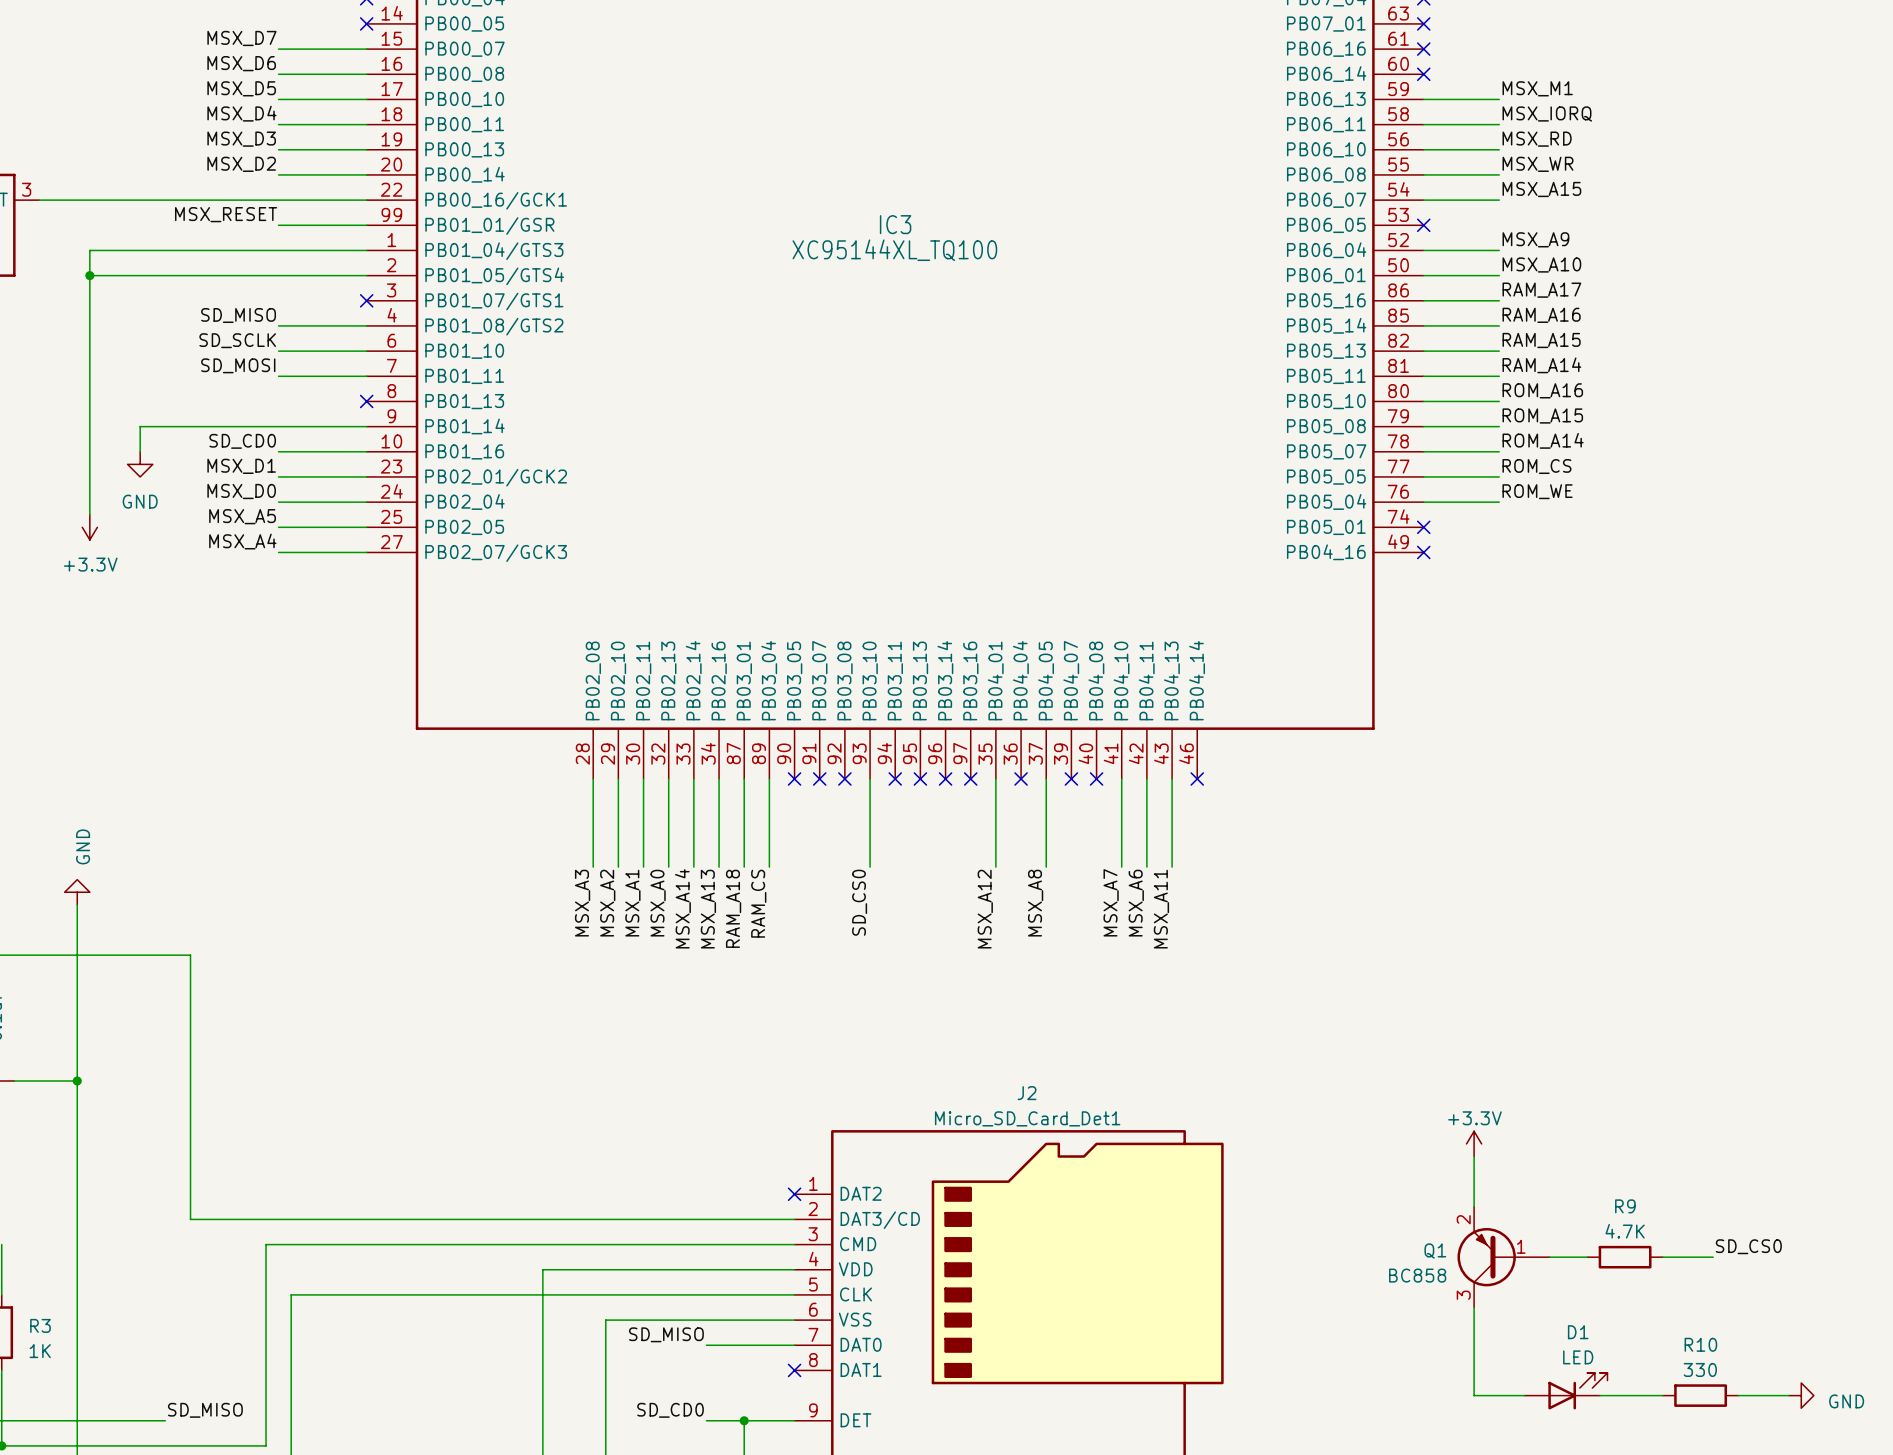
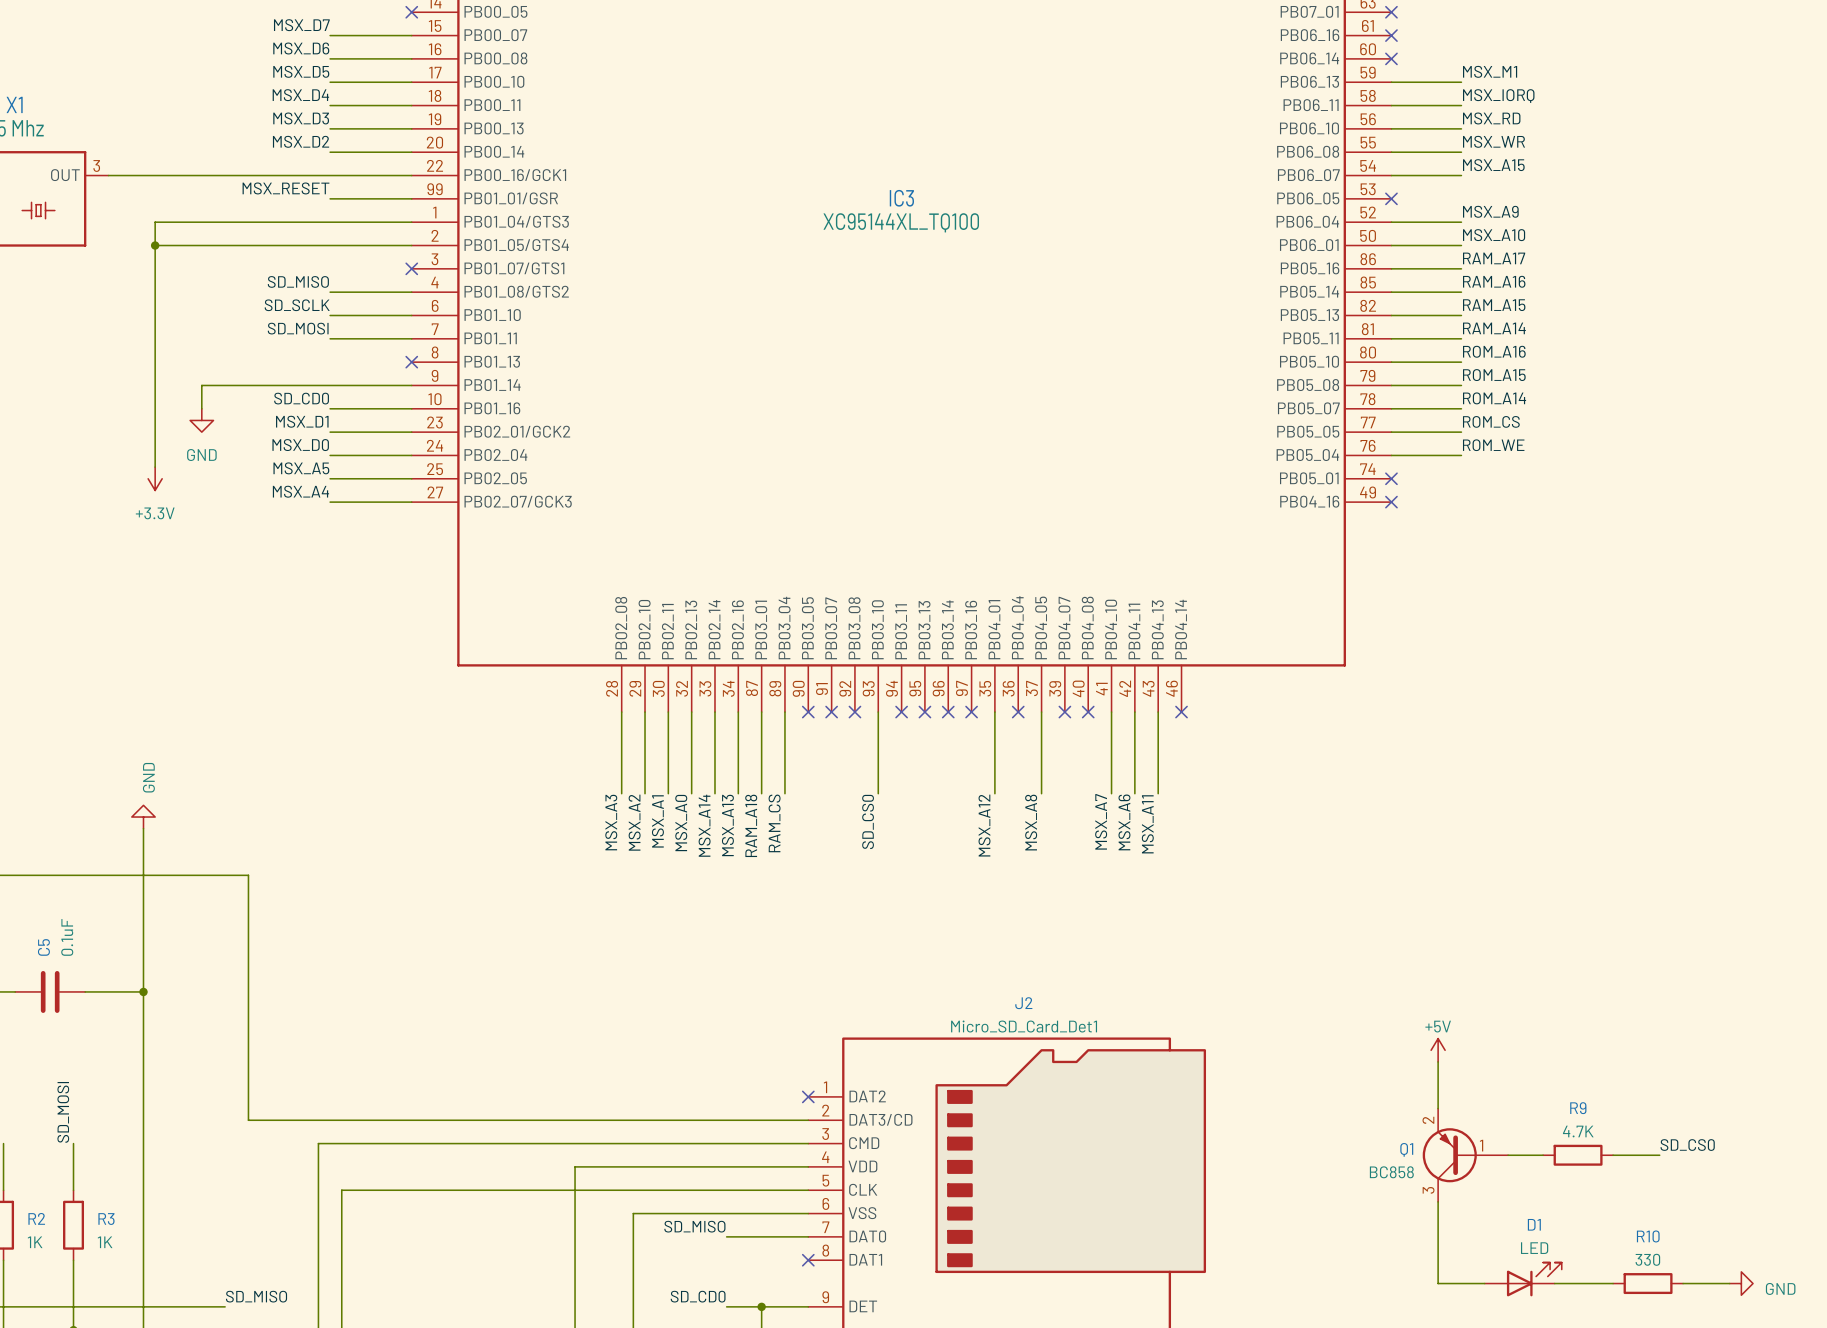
power symbol: +3.3V (1474, 1143) -> +5V (1438, 1050)

